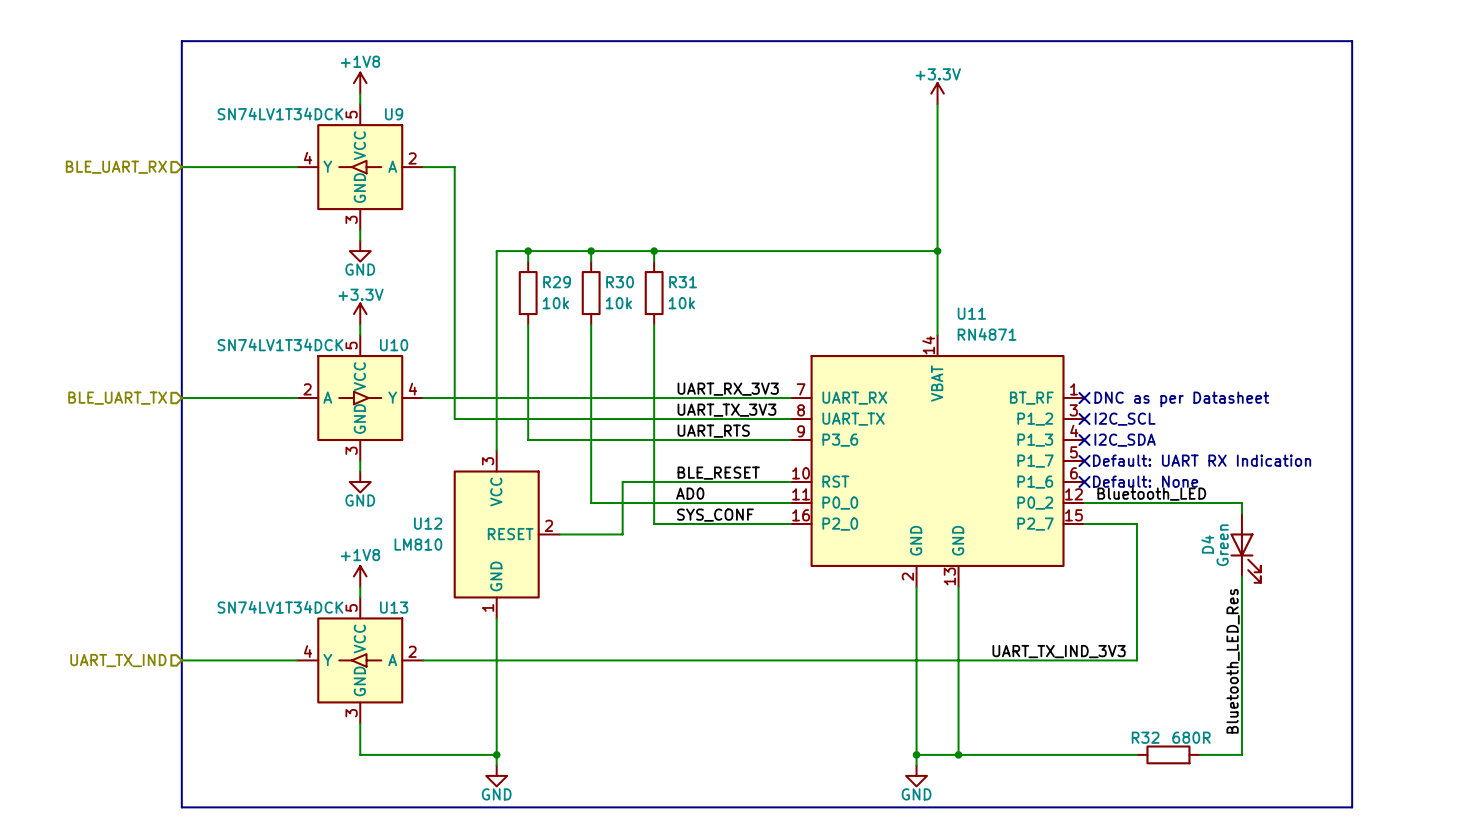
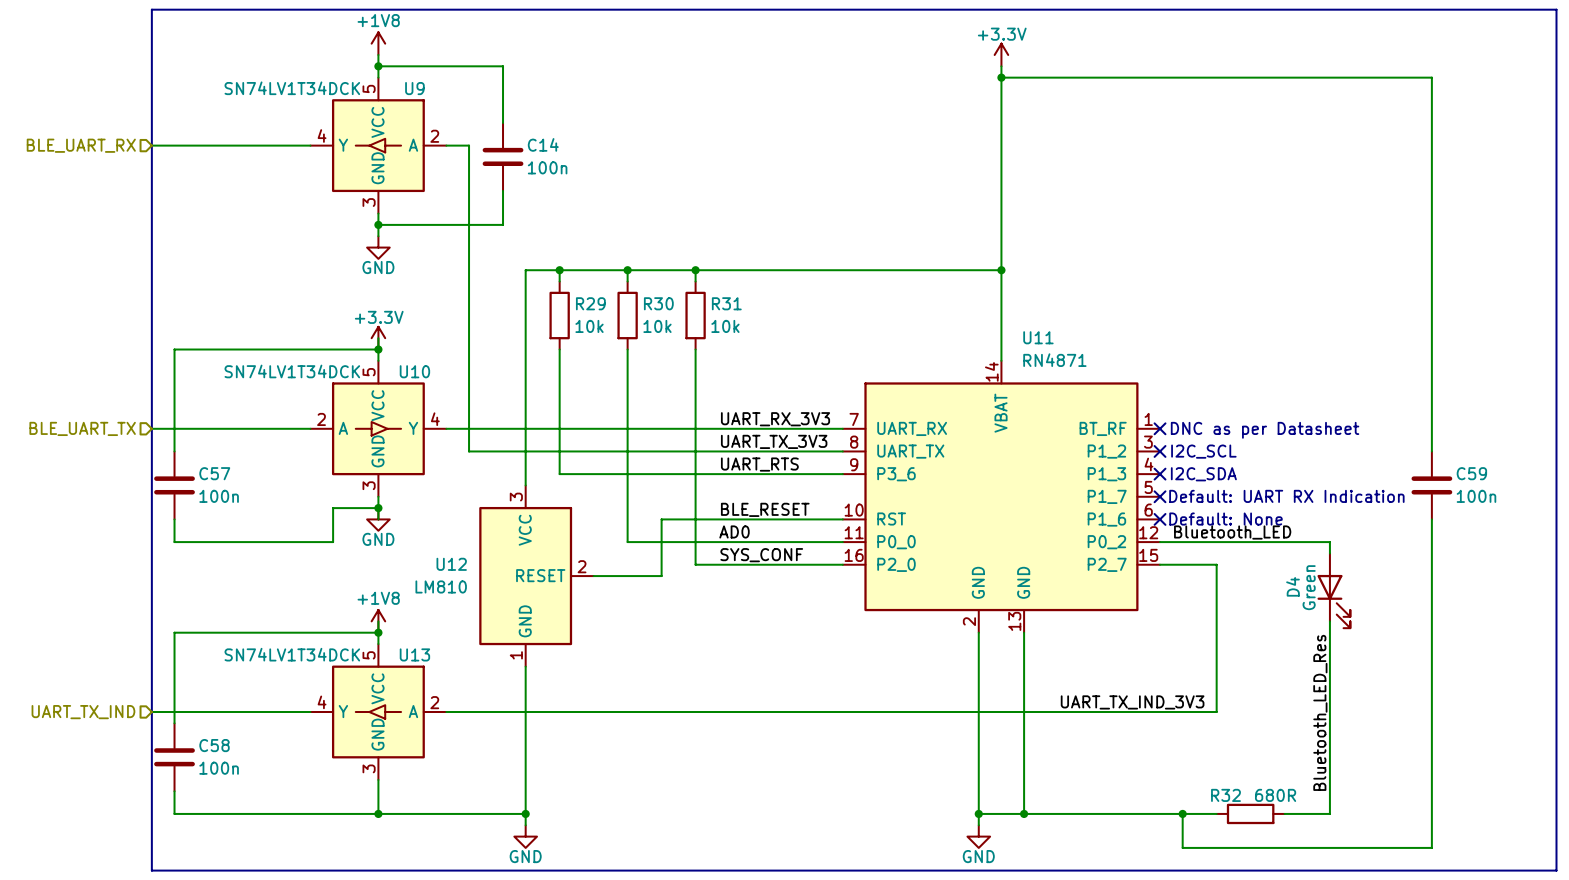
wire: none -> (378, 54) (378, 77)
wire: none -> (378, 66) (503, 66) (503, 122)
junction: none -> (378, 66)
wire: none -> (1001, 77) (1431, 77) (1431, 451)
junction: none -> (1001, 77)
power symbol position: +1V8 (360, 83) -> +1V8 (378, 43)
power symbol position: +3.3V (937, 93) -> +3.3V (1001, 54)
wire: none -> (151, 145) (310, 145)
C14: none -> 100n (503, 156)
hierarchical label position: BLE_UART_RX (116, 167) -> BLE_UART_RX (81, 145)
wire: (181, 167) (297, 167) -> none
U9 position: (360, 167) -> (378, 145)
wire: (423, 167) (454, 167) (454, 419) -> (446, 145) (469, 145) (469, 451) (480, 451)
wire: none -> (503, 190) (503, 224) (378, 224)
junction: none -> (378, 224)
wire: (360, 230) (360, 240) -> none
power symbol position: GND (360, 251) -> GND (378, 247)
wire: none -> (378, 338) (378, 349) (174, 349) (174, 451)
junction: none -> (378, 349)
hierarchical label position: BLE_UART_TX (117, 398) -> BLE_UART_TX (82, 428)
wire: none -> (151, 428) (185, 428)
C57: none -> 100n (174, 485)
C59: none -> 100n (1431, 485)
junction: none -> (378, 508)
wire: none -> (174, 519) (174, 542) (333, 542) (333, 508) (378, 508) (378, 519)
wire: none -> (1431, 519) (1431, 847) (1182, 847) (1182, 813)
wire: none -> (378, 621) (378, 632) (174, 632) (174, 723)
junction: none -> (378, 632)
hierarchical label position: UART_TX_IND (118, 660) -> UART_TX_IND (83, 712)
wire: none -> (151, 711) (185, 711)
C58: none -> 100n (174, 757)
wire: none -> (174, 791) (174, 813) (378, 813)
junction: none -> (378, 813)
junction: none -> (1182, 813)
line: (181, 807) (181, 41) (1352, 41) (1352, 807) -> (185, 870) (151, 870) (151, 9) (1556, 9) (1556, 870) (1448, 870)

